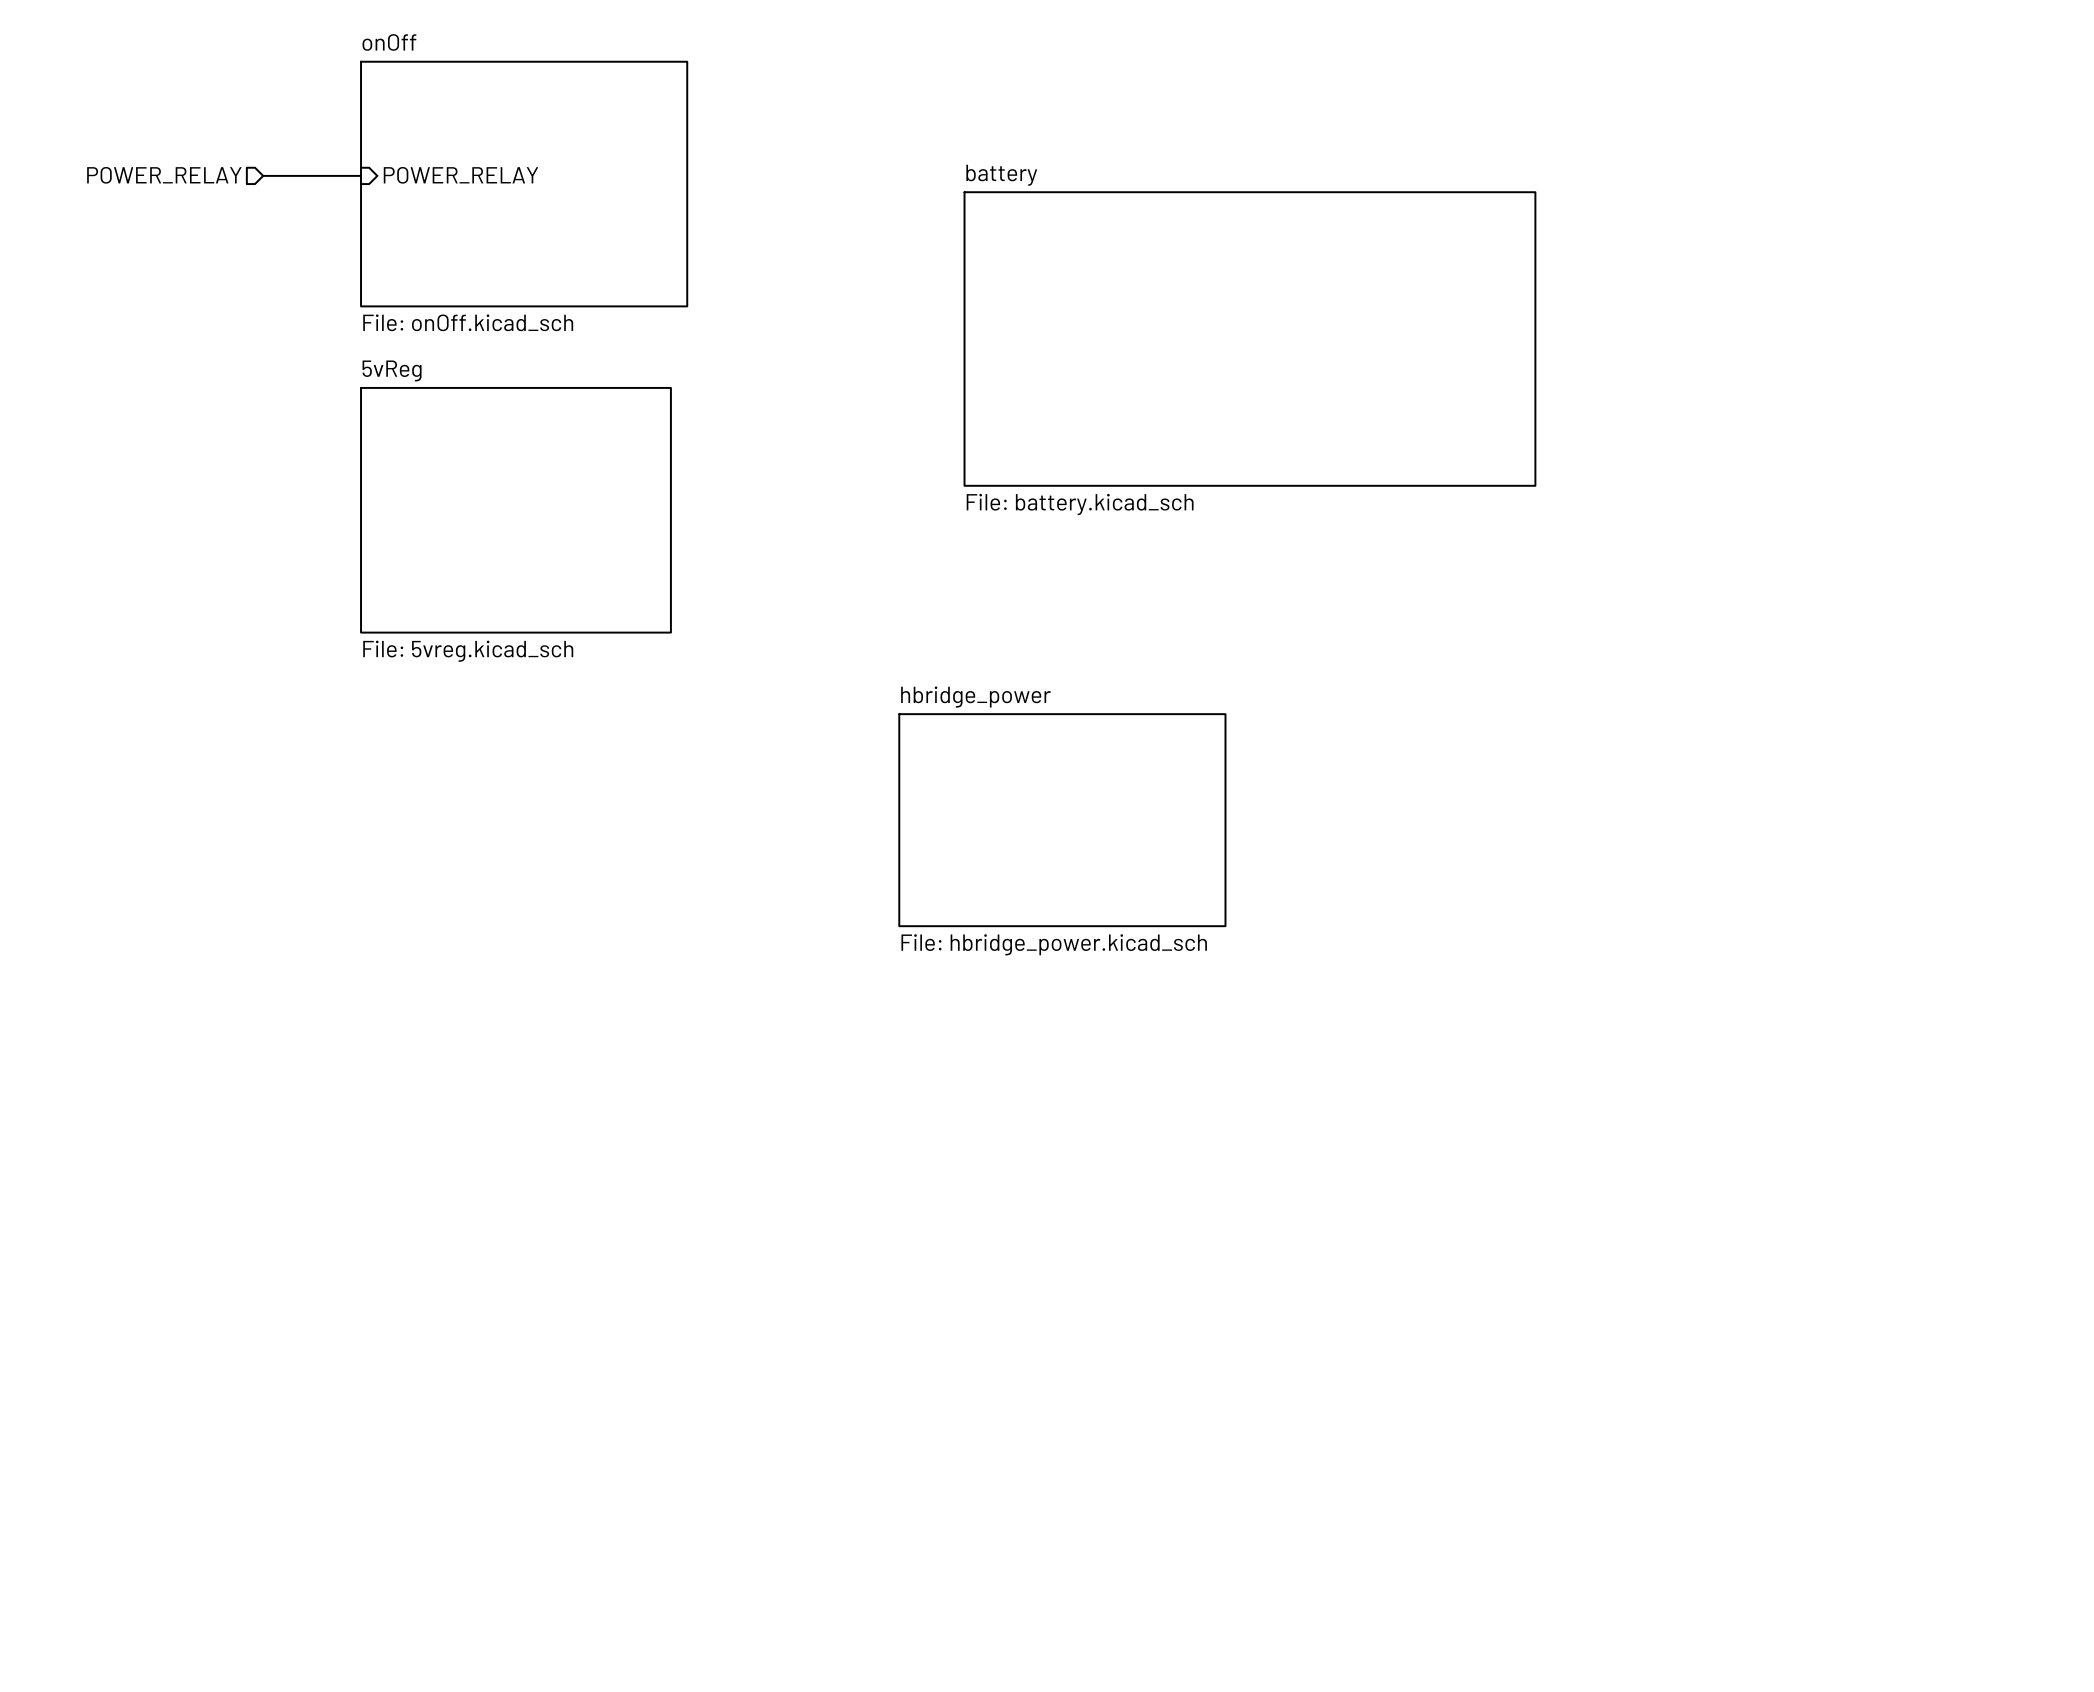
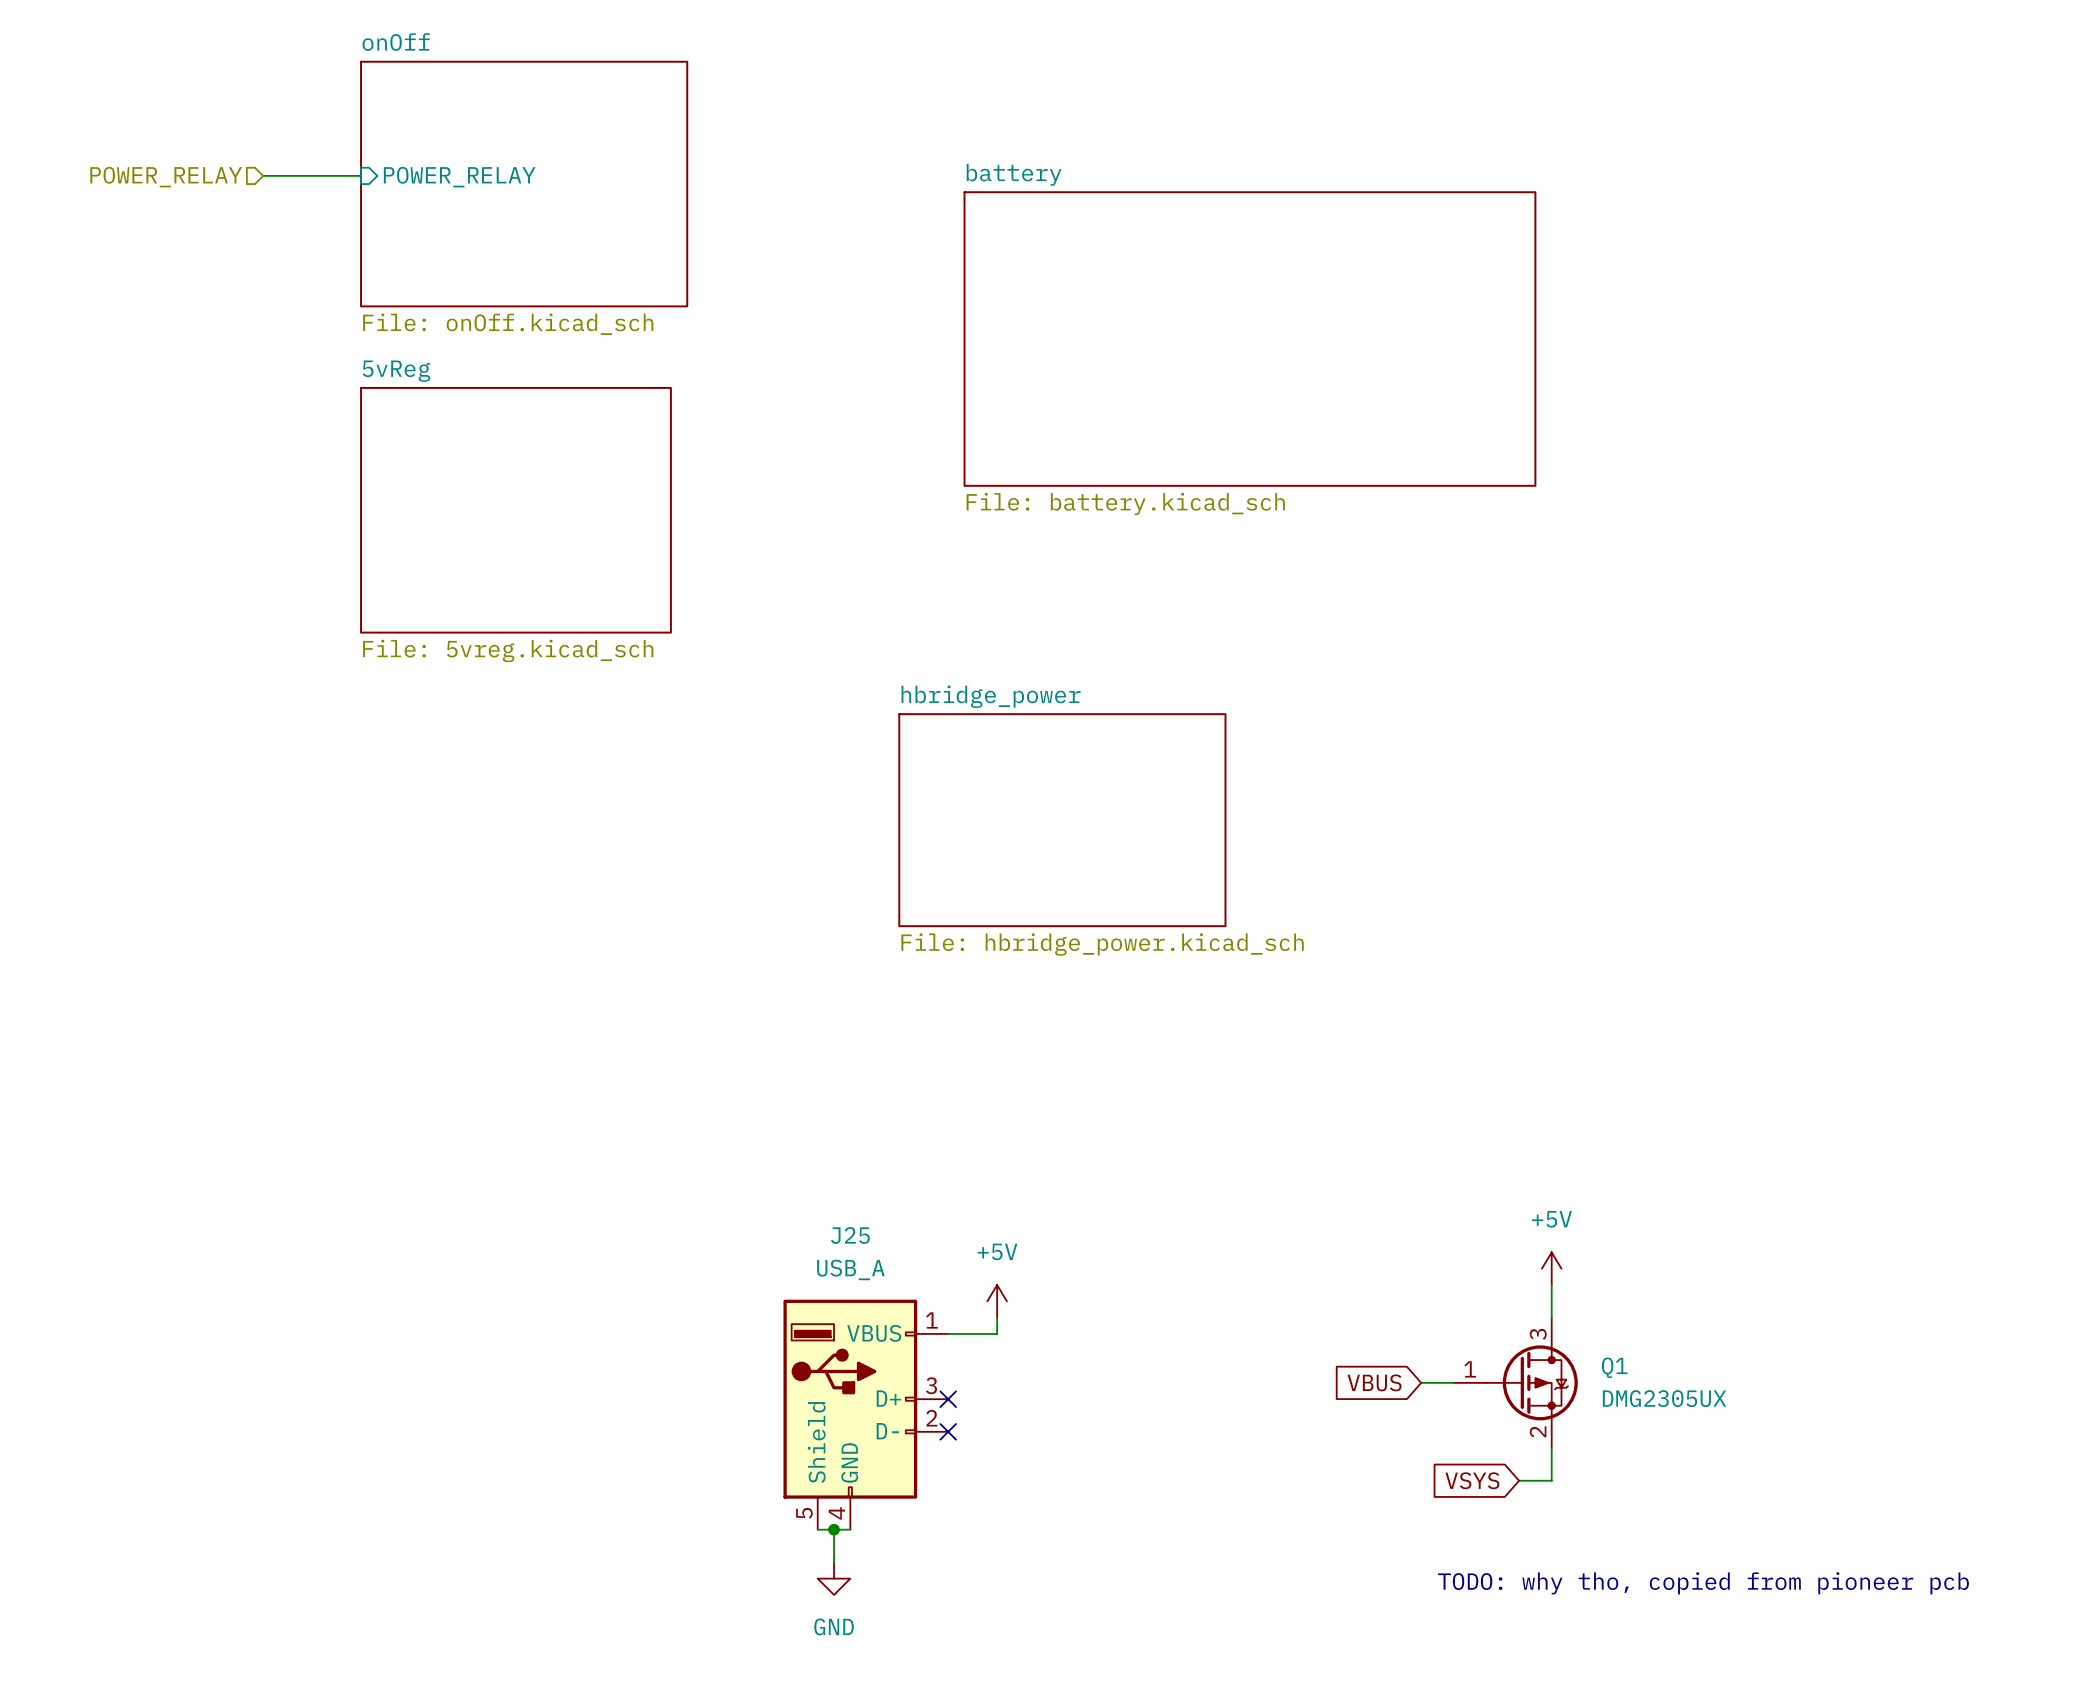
power symbol: none -> +5V (1551, 1268)
wire: none -> (1551, 1285) (1551, 1317)
power symbol: none -> +5V (997, 1301)
wire: none -> (997, 1317) (997, 1333) (948, 1333)
global label: none -> VBUS (1374, 1382)
wire: none -> (1421, 1382) (1453, 1382)
Q1: none -> DMG2305UX (1515, 1382)
no-connect mark: none -> (948, 1399)
J25: none -> USB_A (865, 1414)
no-connect mark: none -> (948, 1431)
wire: none -> (1551, 1448) (1551, 1480) (1519, 1480)
global label: none -> VSYS (1472, 1480)
wire: none -> (817, 1529) (850, 1529)
wire: none -> (834, 1529) (834, 1562)
junction: none -> (834, 1529)
power symbol: none -> GND (834, 1578)
text: none -> TODO: why tho, copied from pioneer pcb (1703, 1583)

